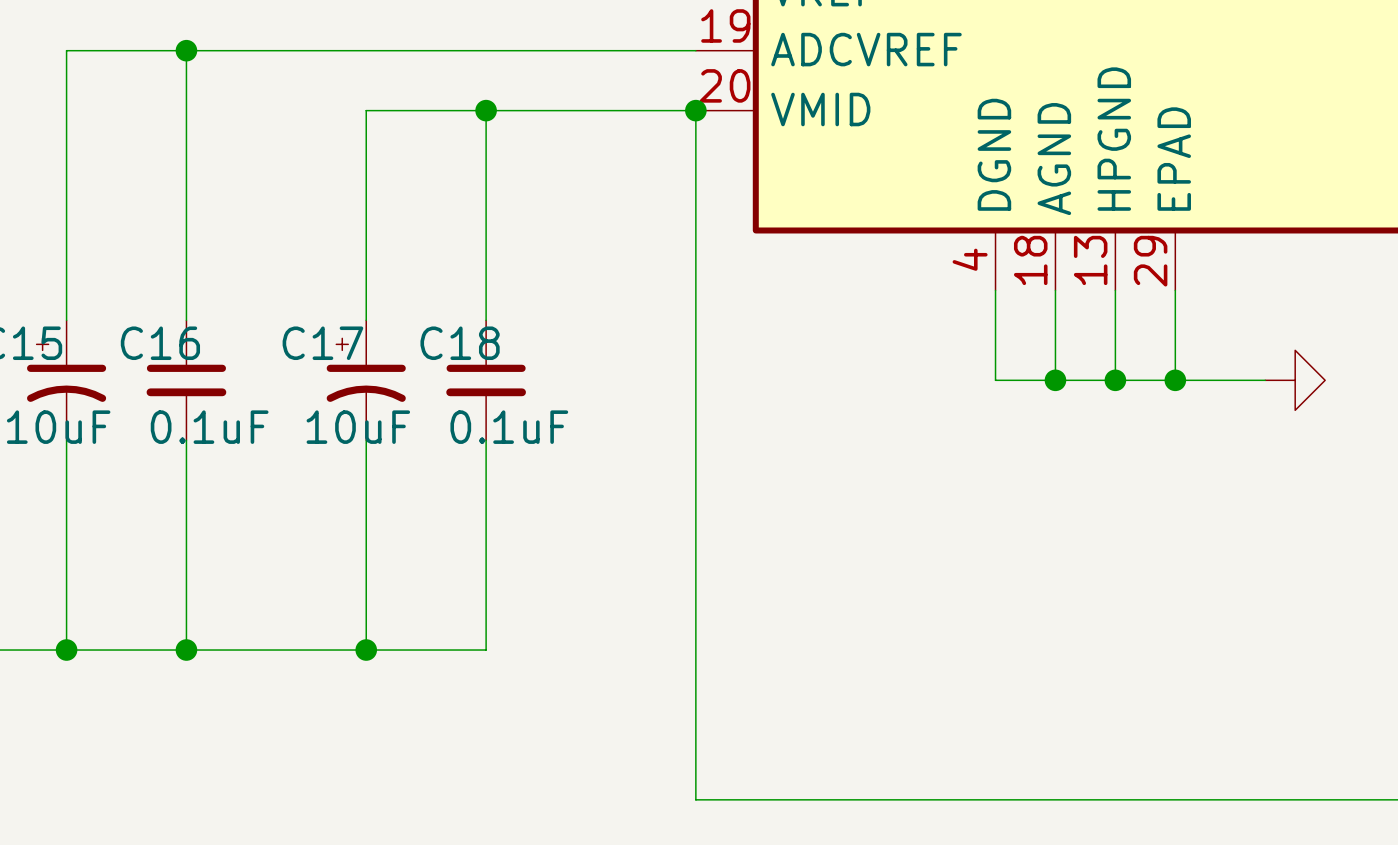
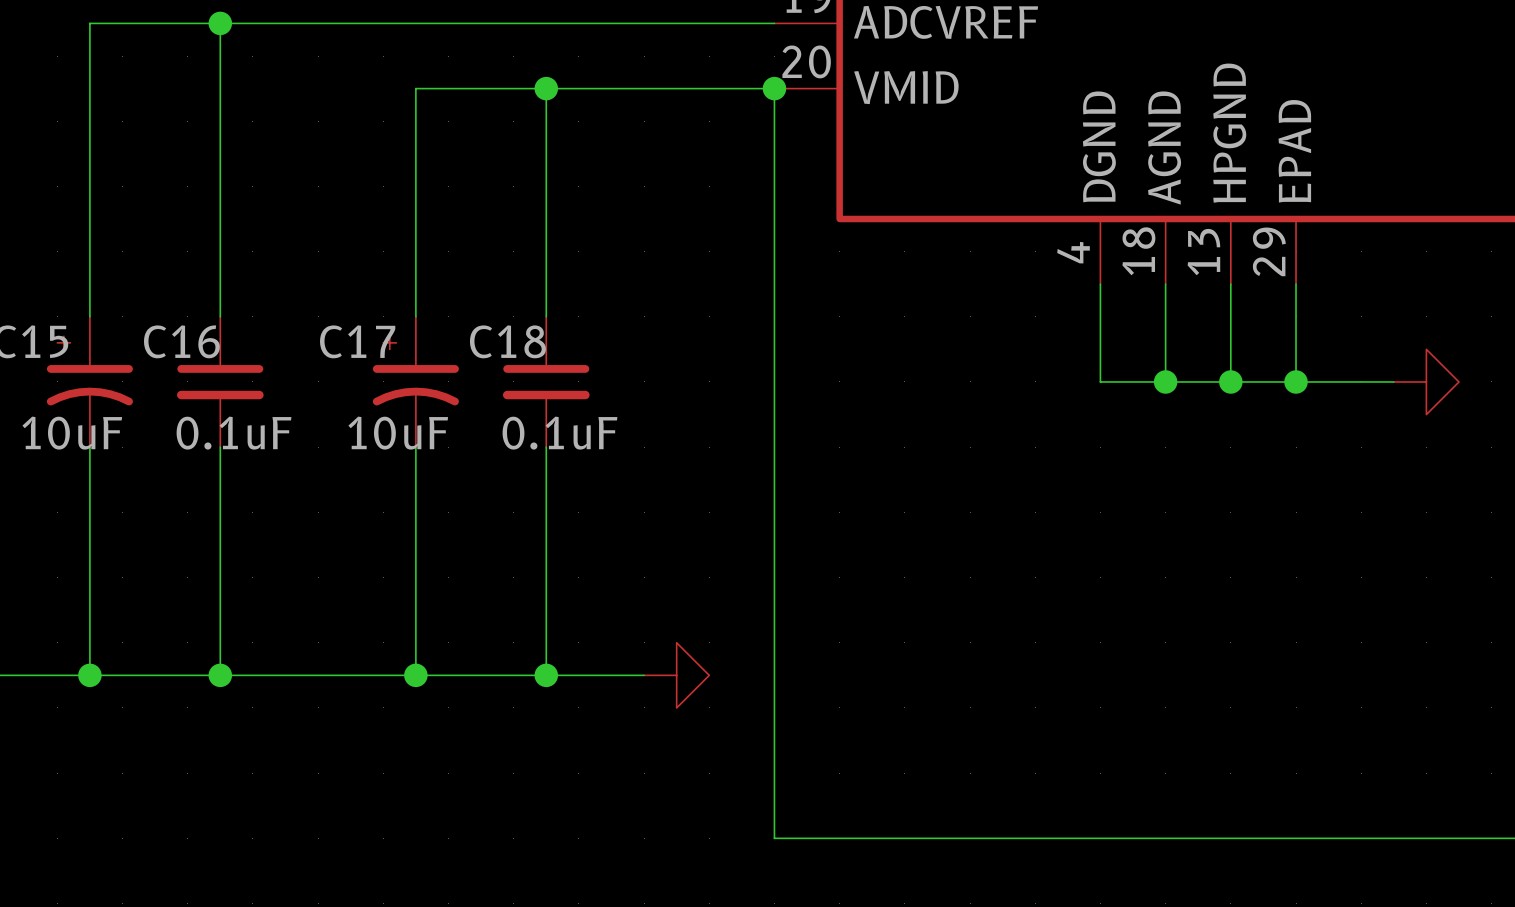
wire: none -> (546, 675) (644, 675)
junction: none -> (546, 675)
power symbol: none -> (676, 675)

